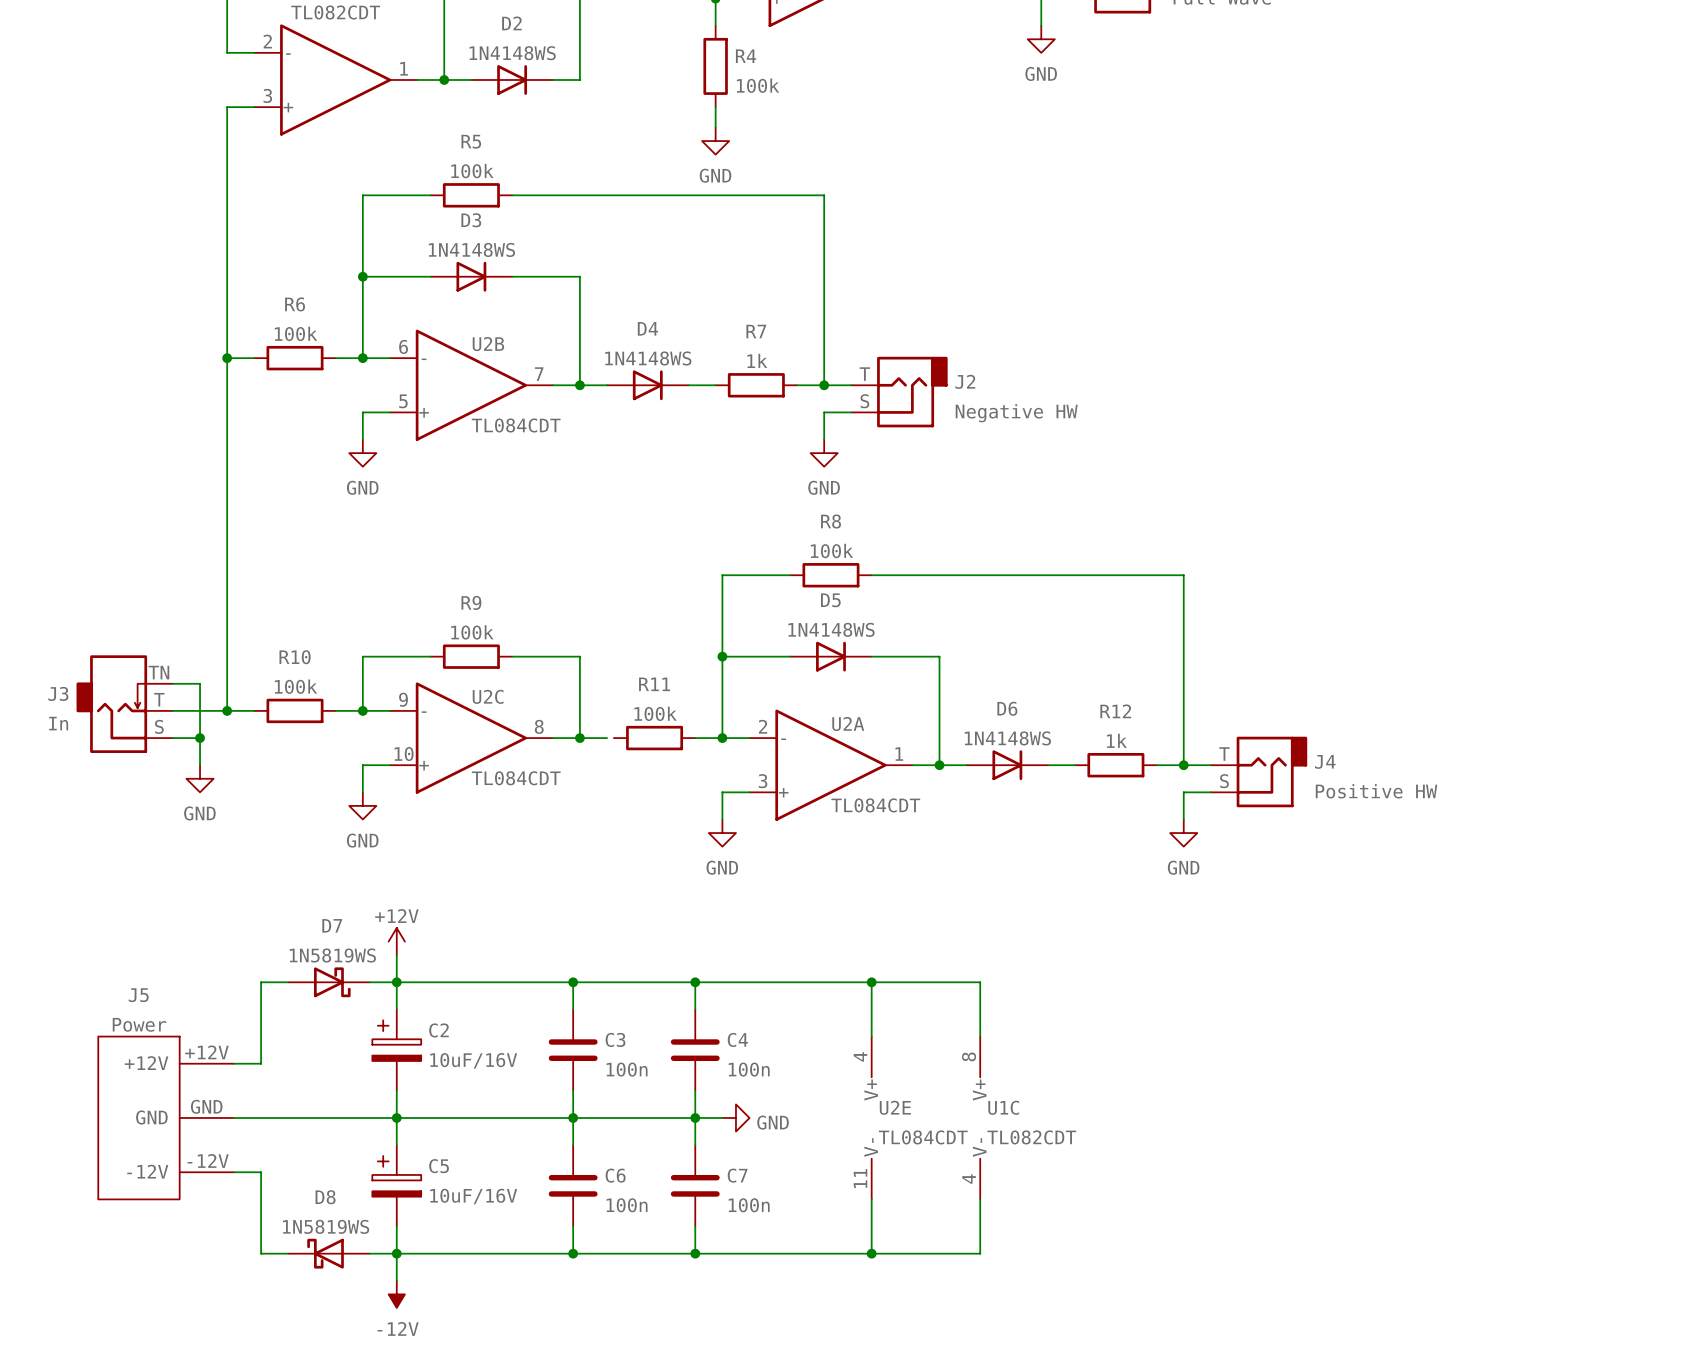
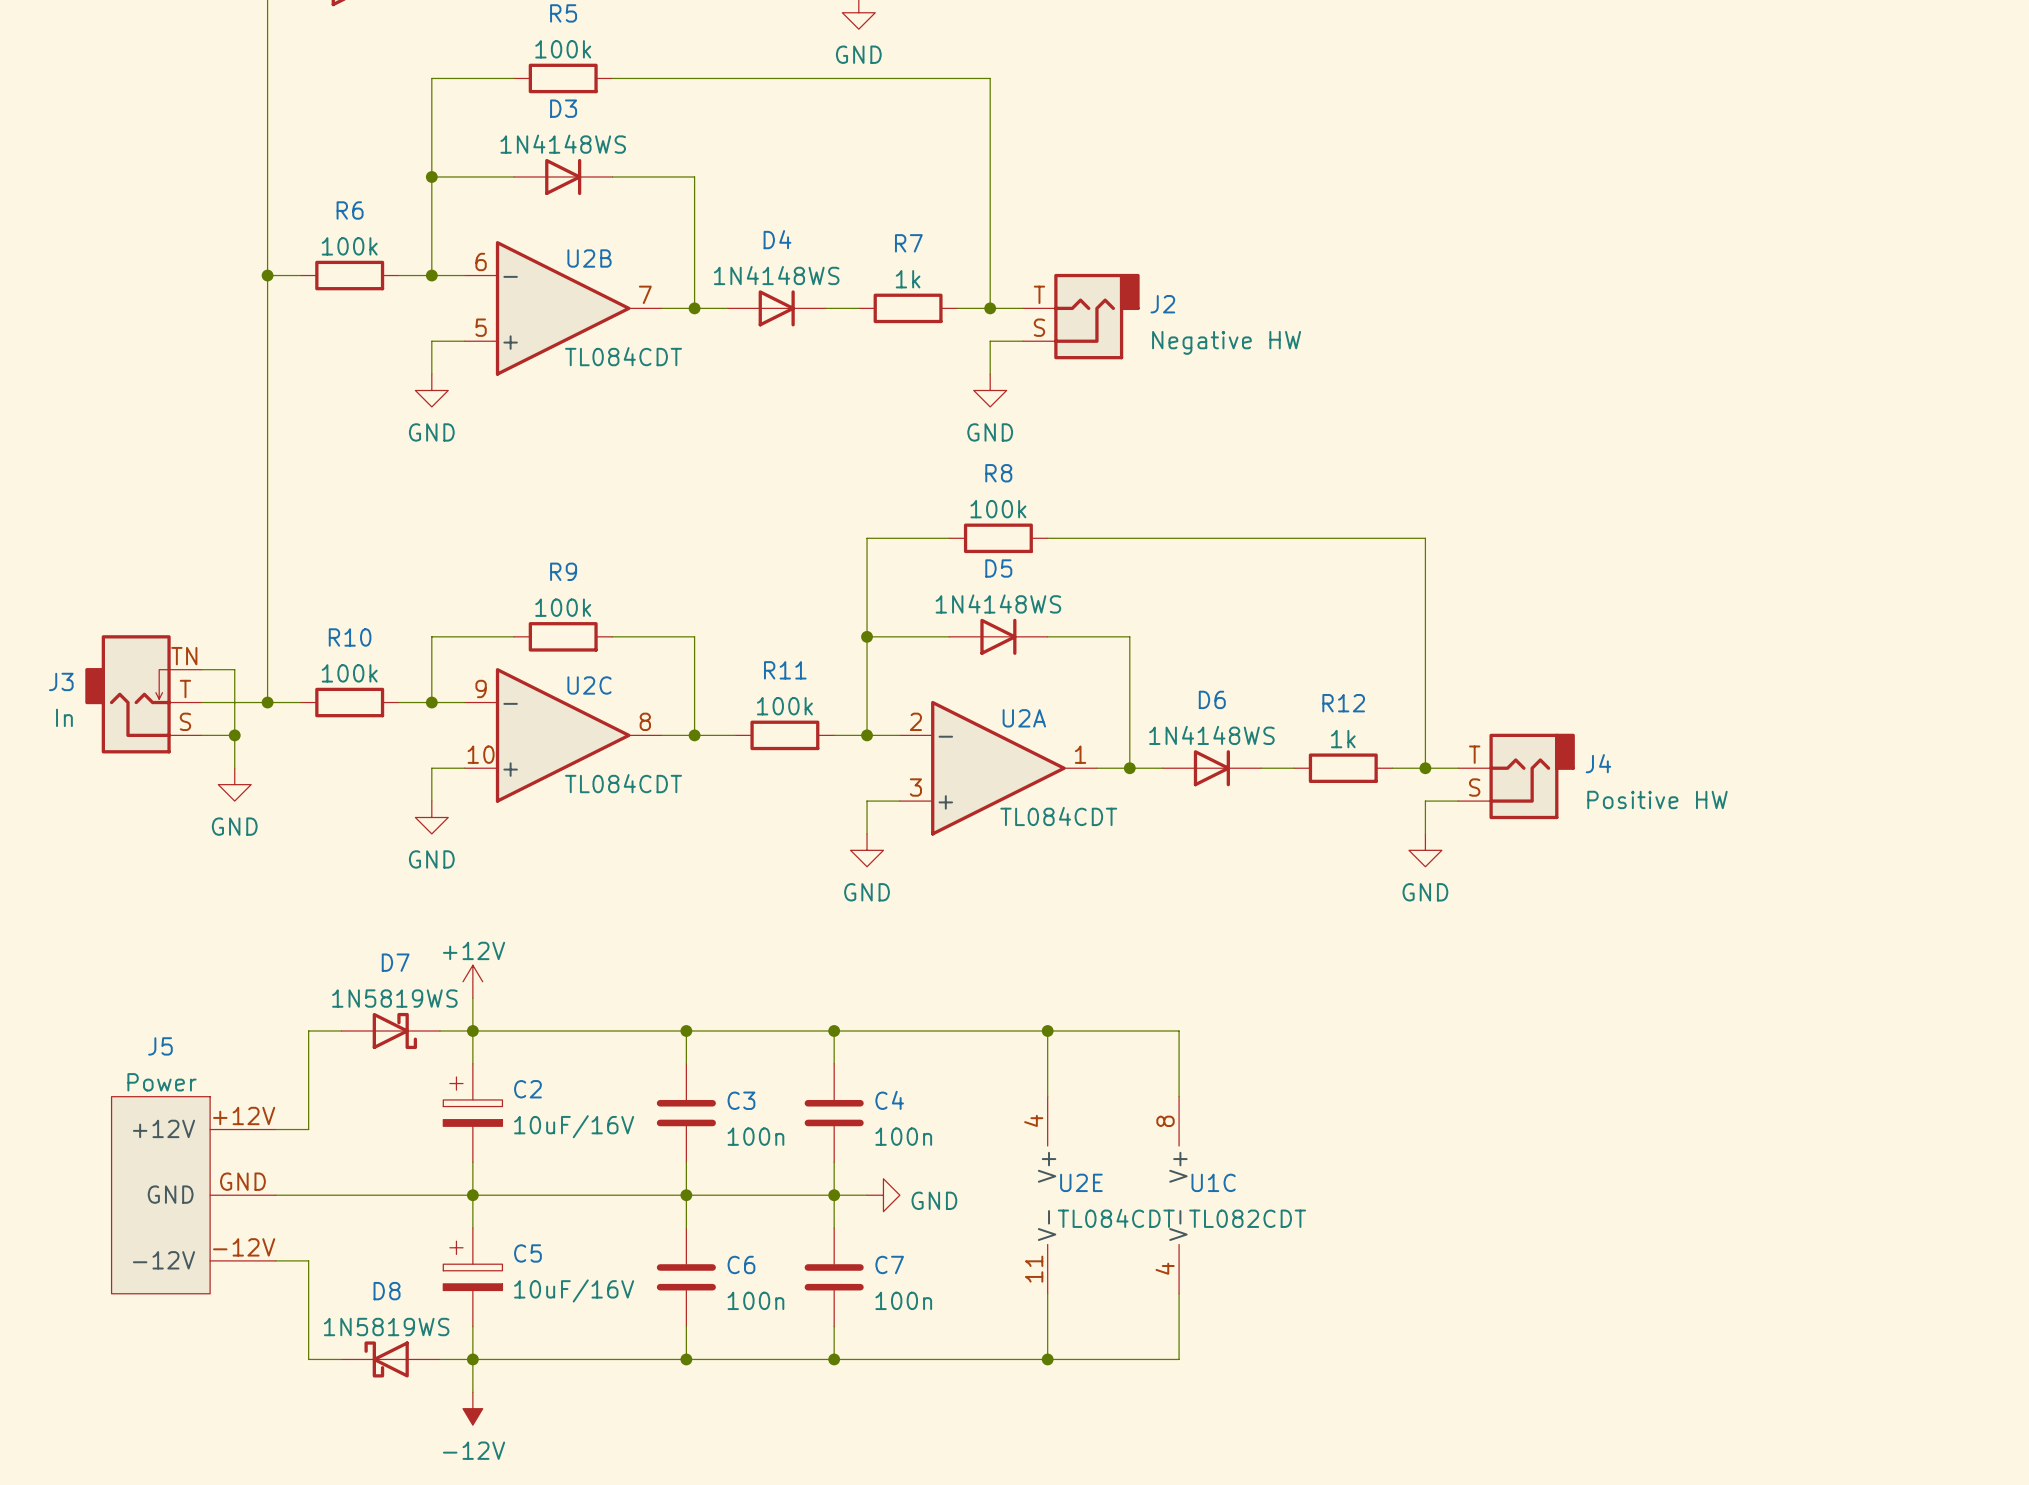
wire: none -> (727, 735) (735, 735)

